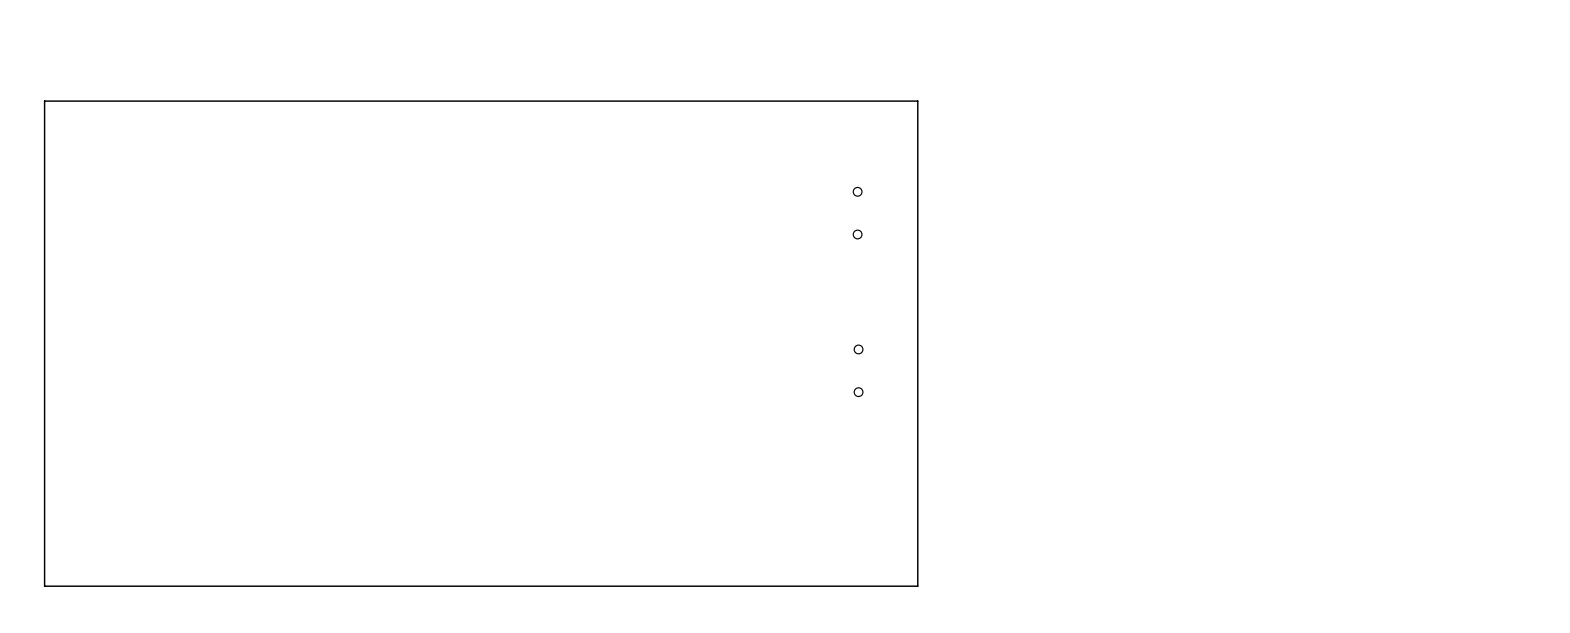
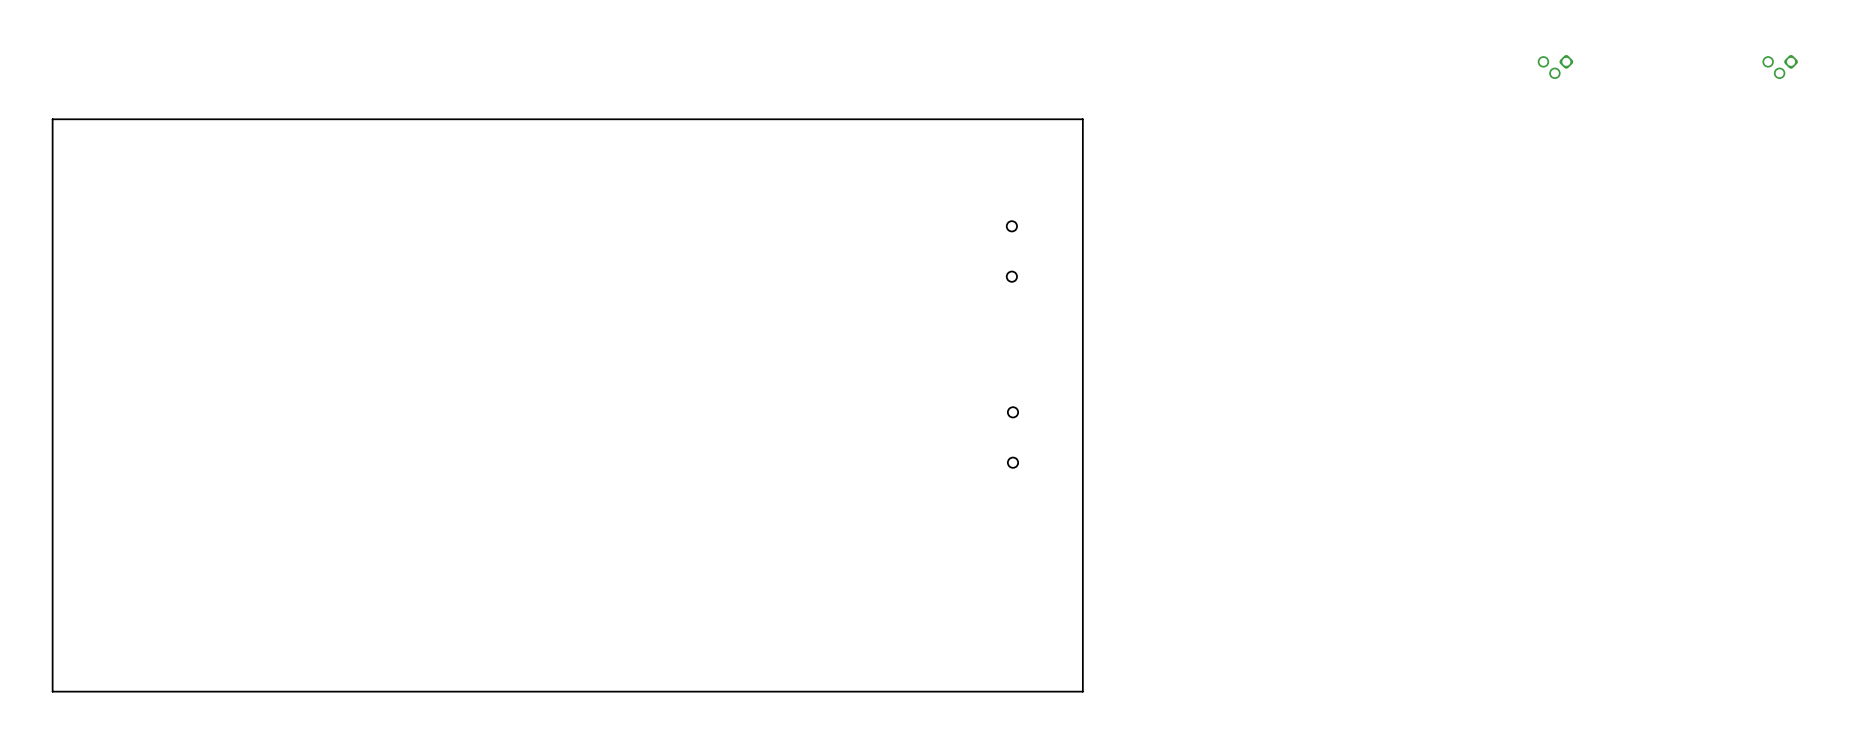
part: none -> (1555, 66)
part: none -> (1780, 66)

